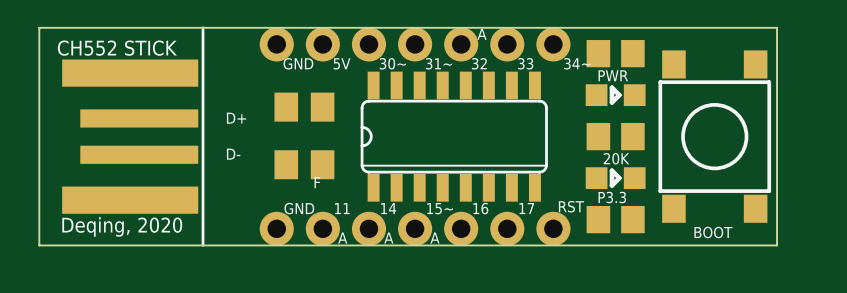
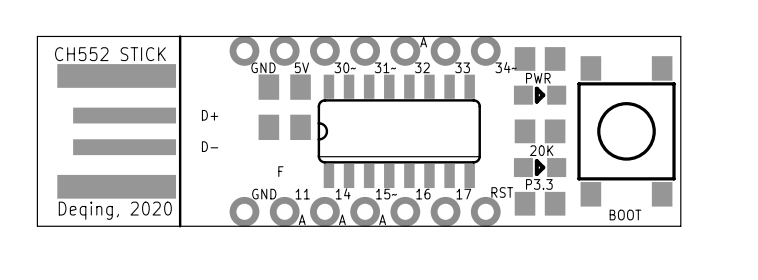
part: none -> (284, 87)
part: (304, 107) -> none
part: none -> (284, 127)
part: (304, 164) -> none

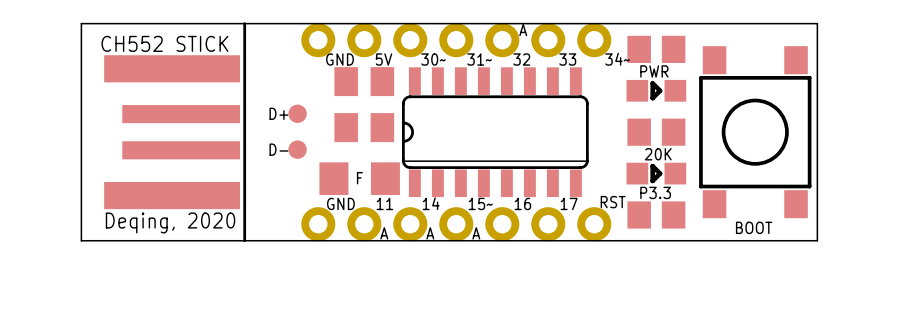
part: none -> (297, 113)
part: none -> (297, 149)
part: none -> (359, 178)

